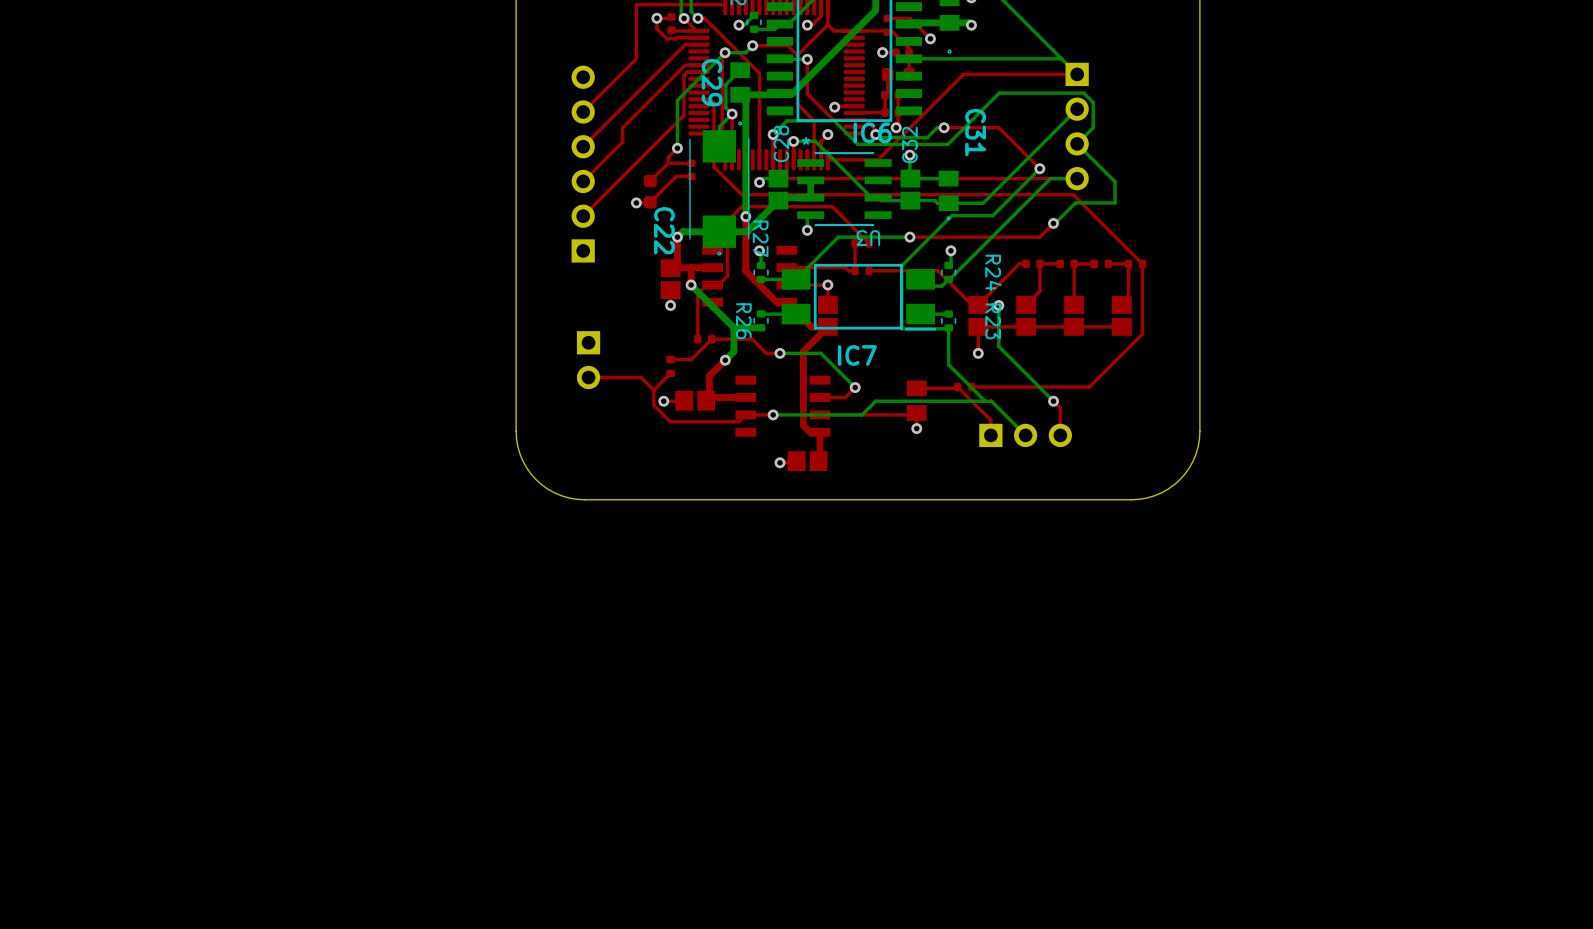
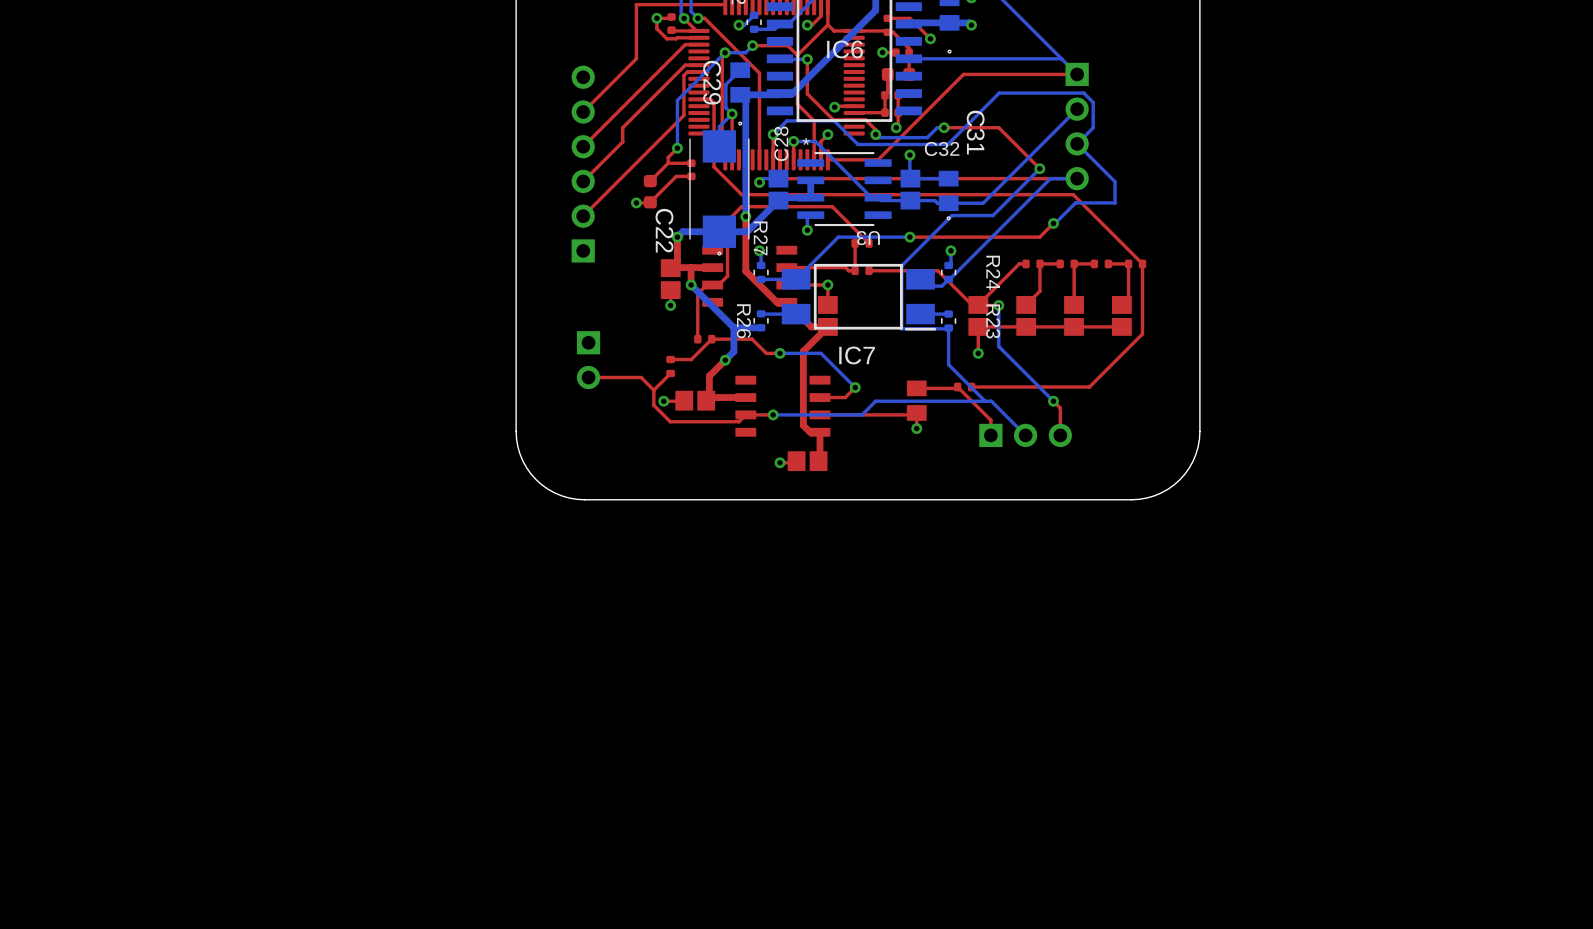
IC6 name position: IC6 (872, 132) -> IC6 (845, 49)
C32 name rotation: 0° (909, 145) -> 90° clockwise (942, 148)

